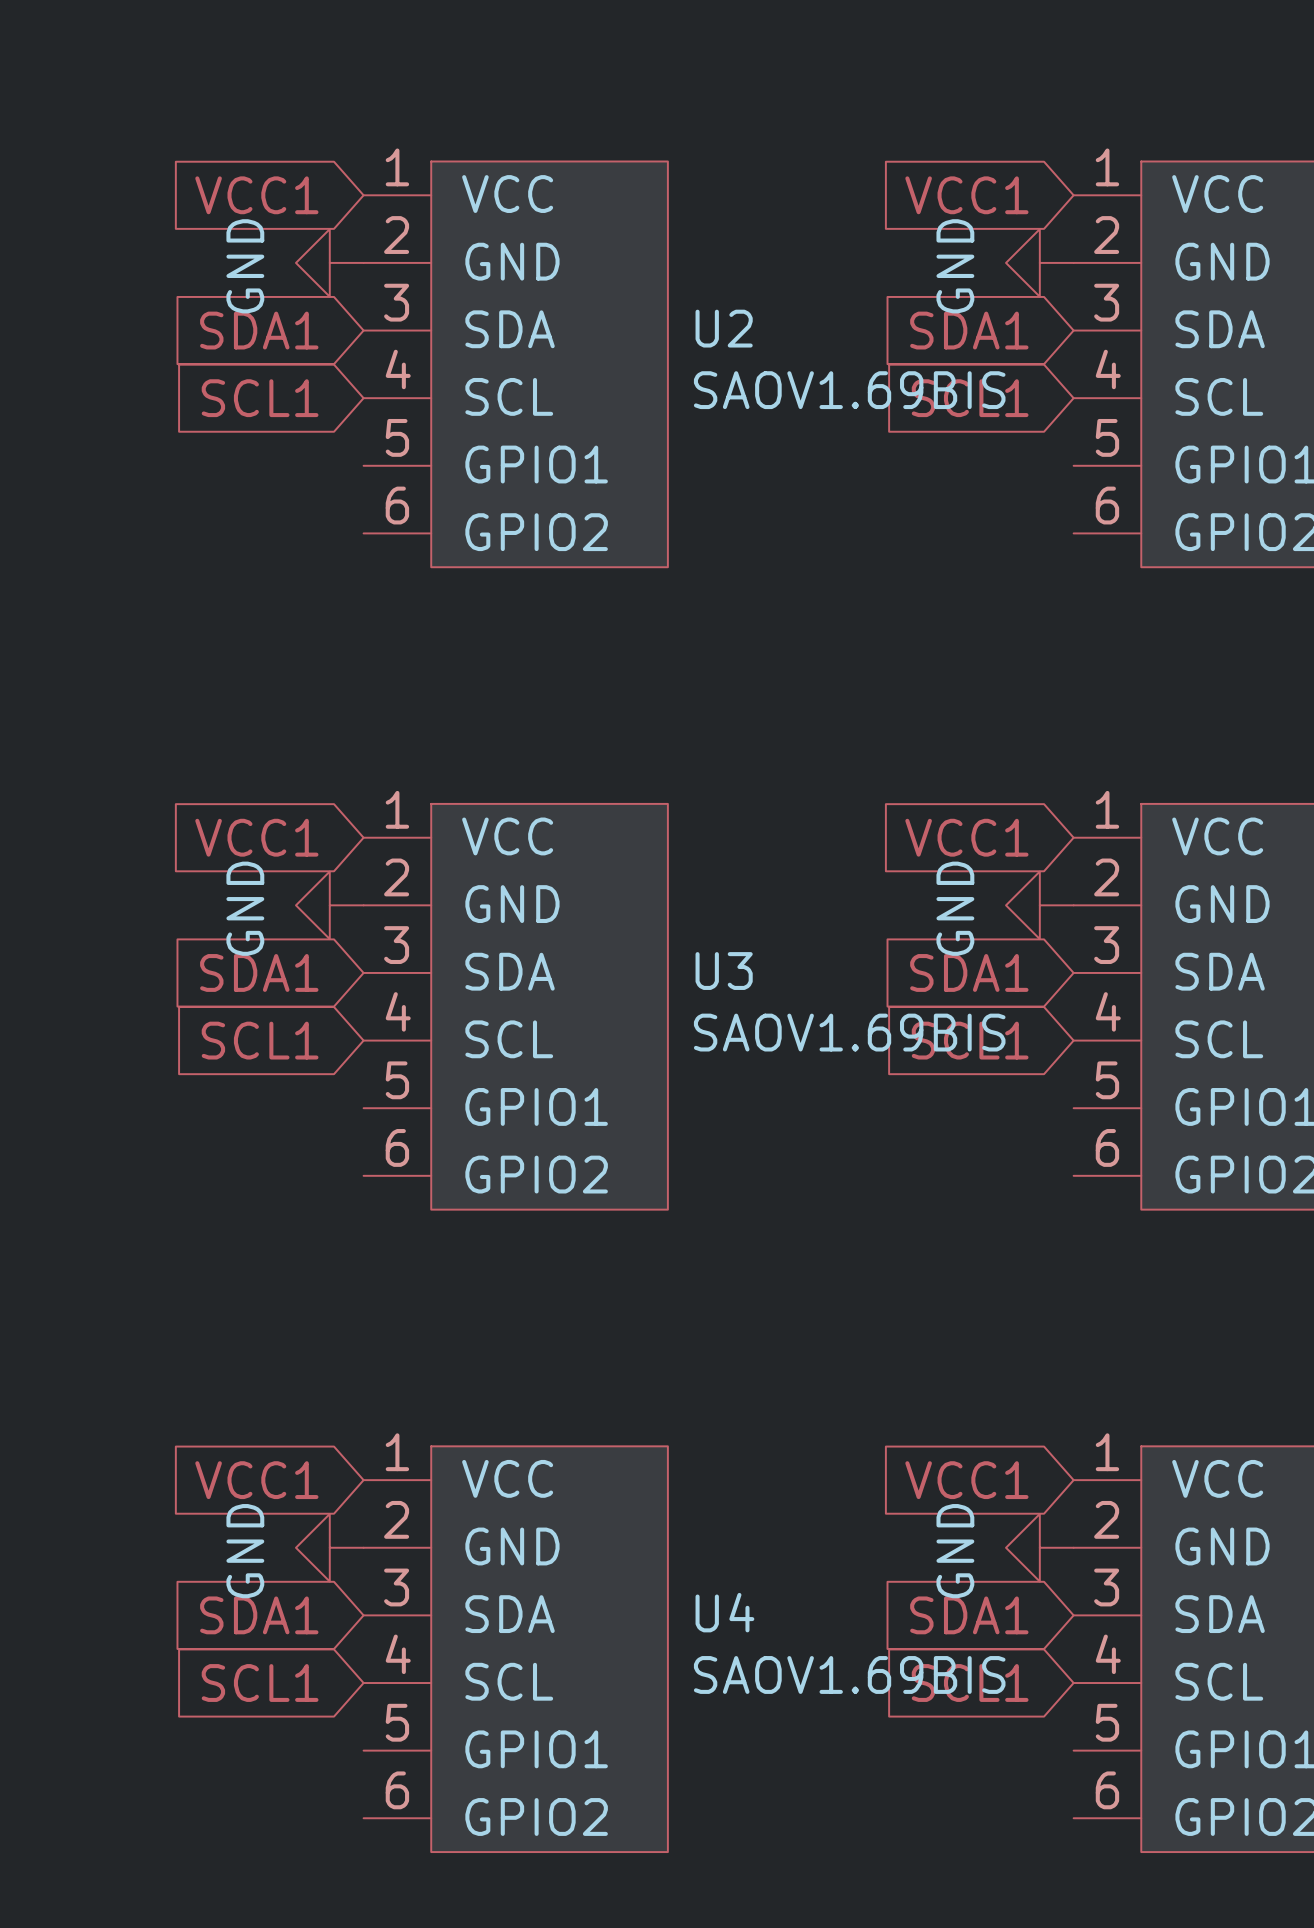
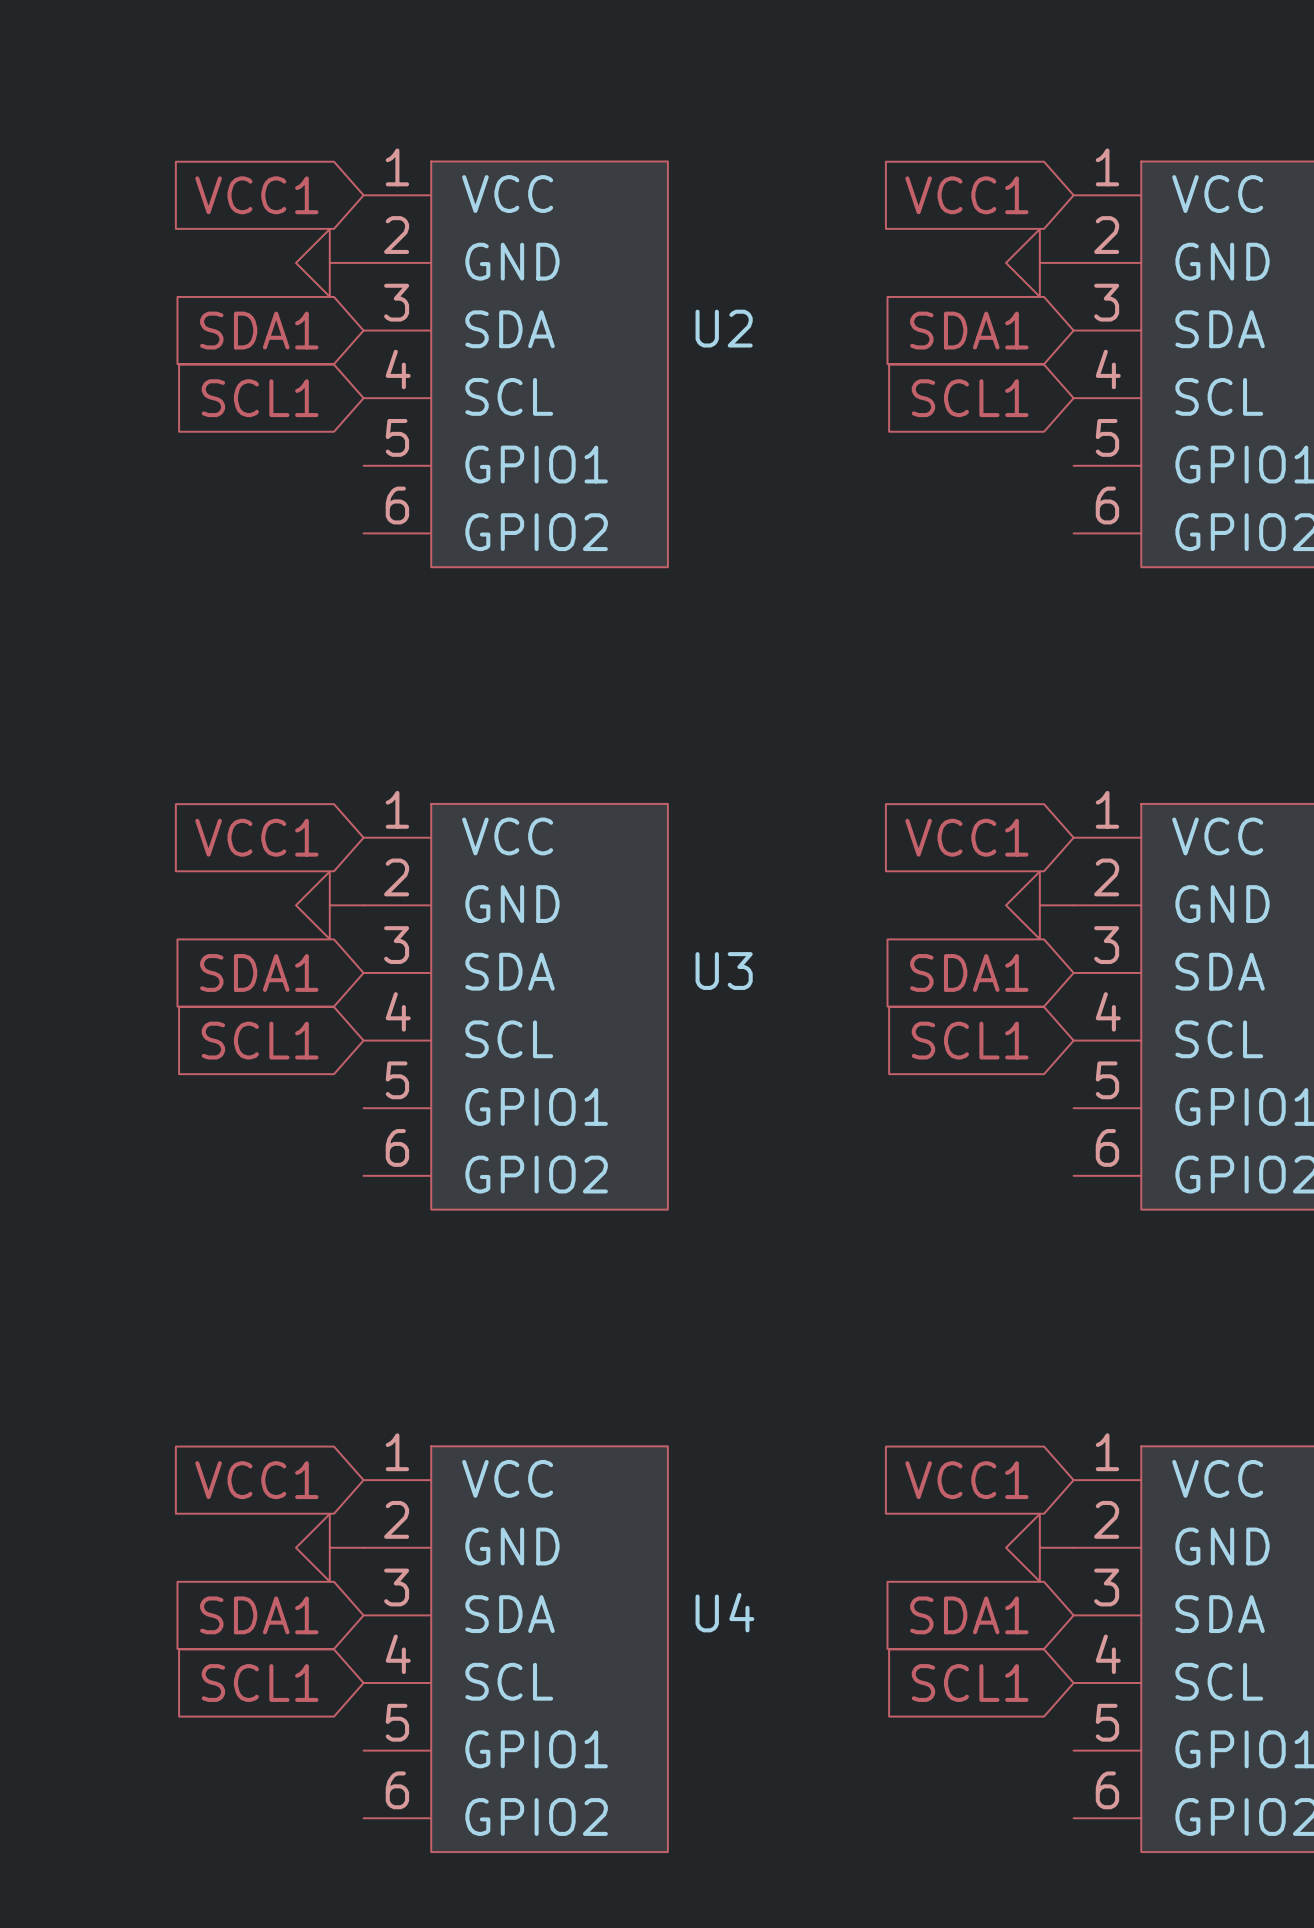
power symbol text: GND (245, 266) -> none
power symbol text: GND (955, 266) -> none
U2 value: SAOV1.69BIS (849, 390) -> none
power symbol text: GND (245, 908) -> none
power symbol text: GND (955, 908) -> none
U3 value: SAOV1.69BIS (849, 1032) -> none
power symbol text: GND (245, 1551) -> none
power symbol text: GND (955, 1551) -> none
U4 value: SAOV1.69BIS (849, 1674) -> none

